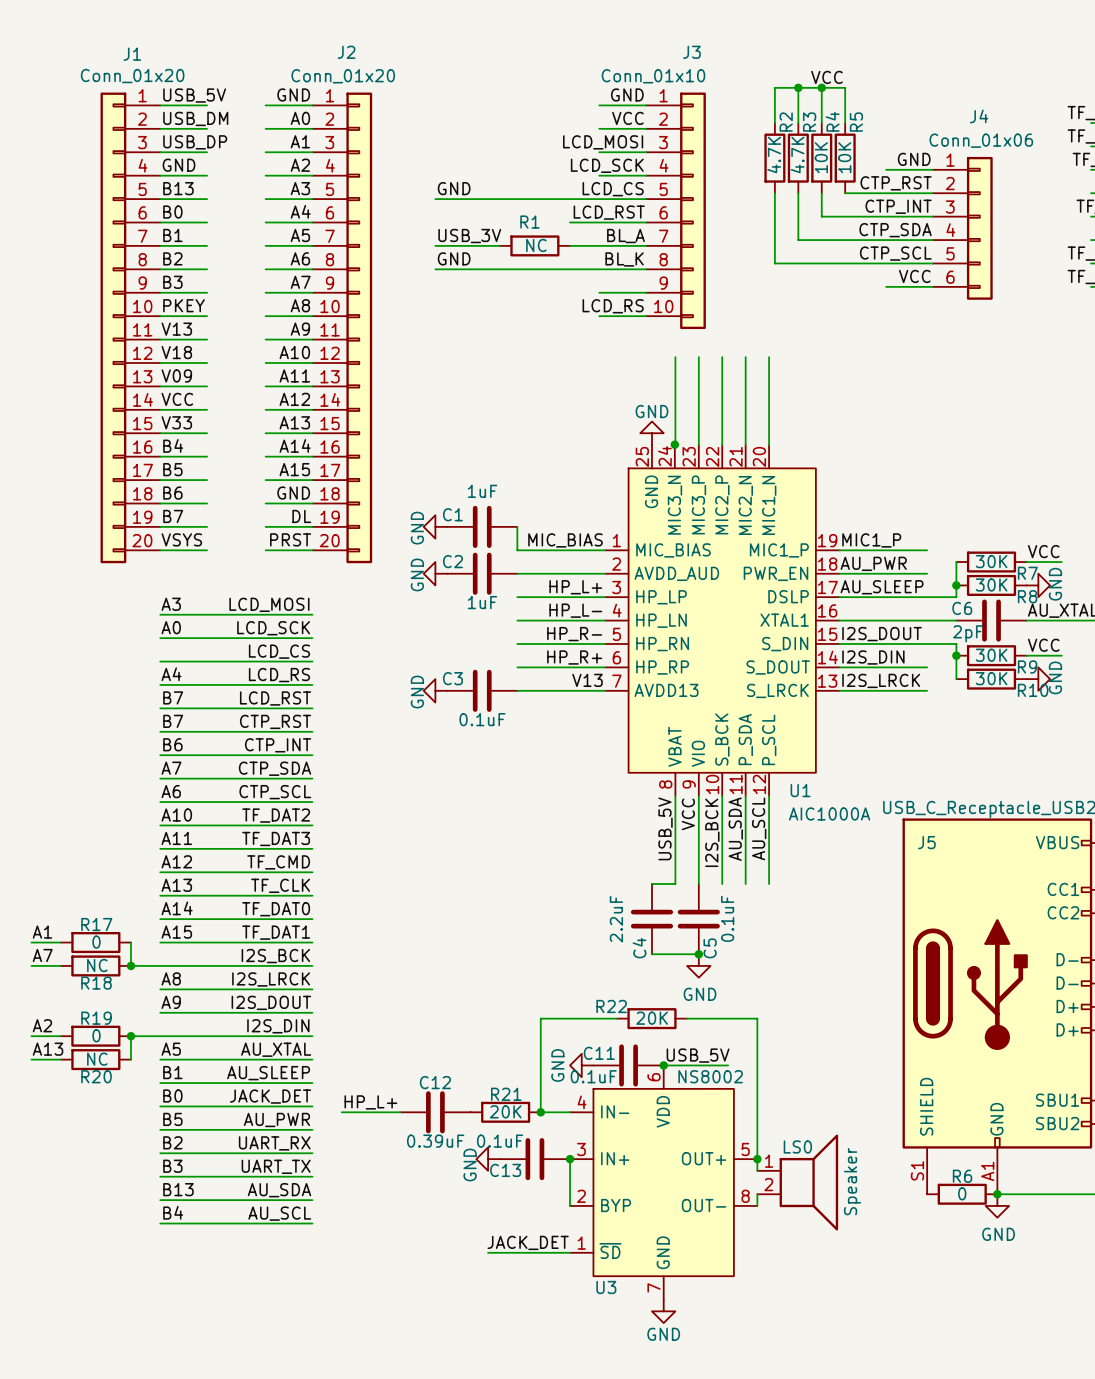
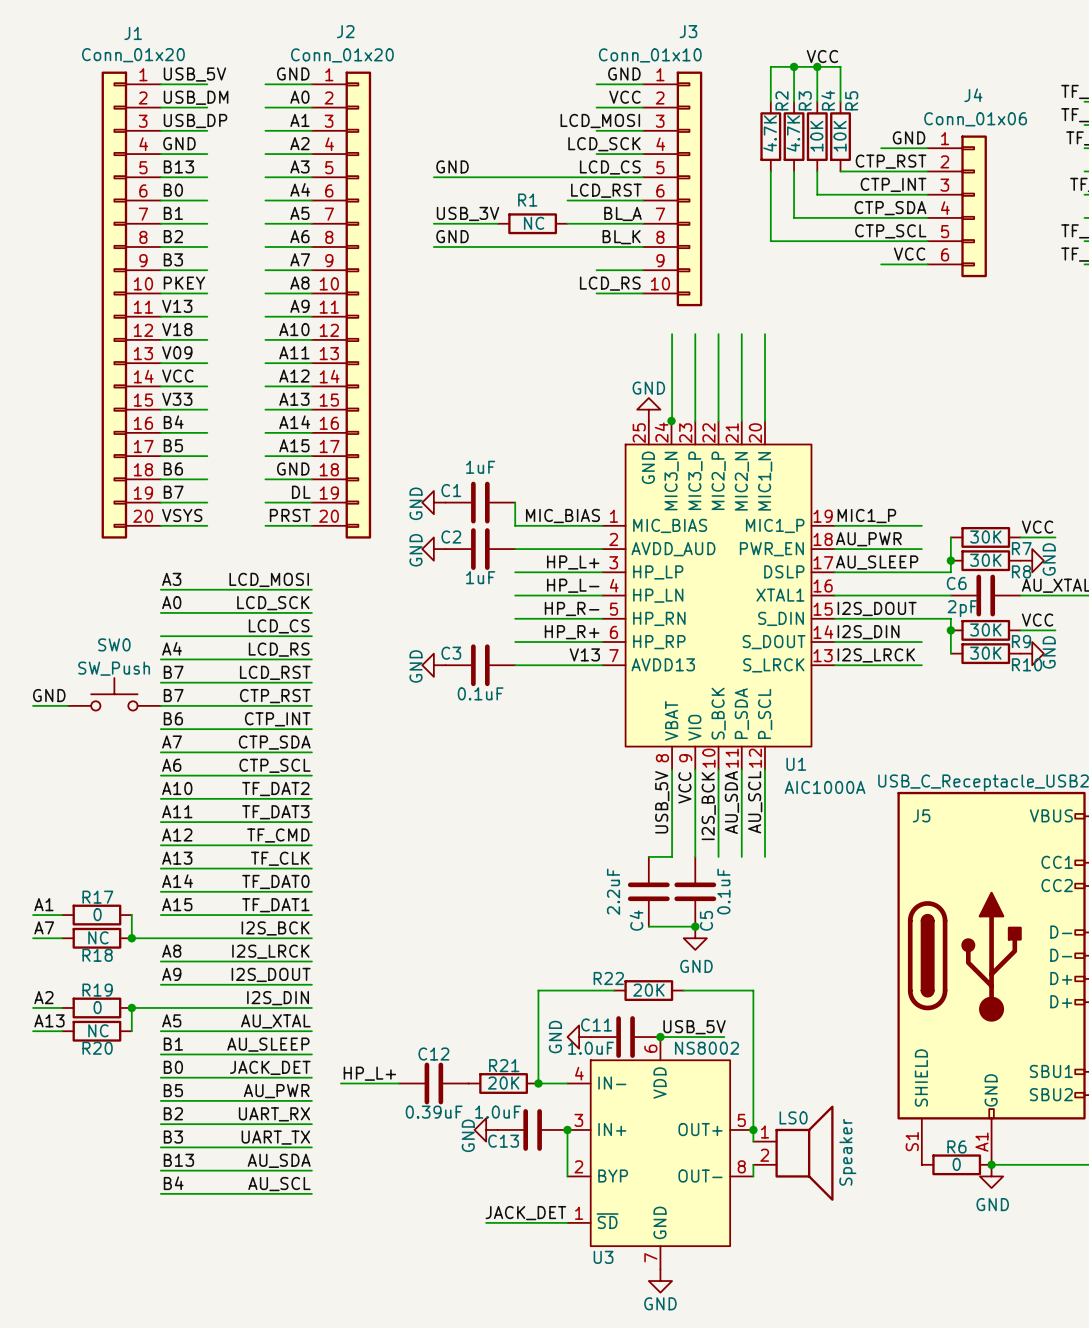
SW0: none -> SW_Push (114, 694)
label: none -> GND (49, 695)
wire: none -> (33, 705) (67, 705)
C11 value: 0.1uF (593, 1076) -> 1.0uF (591, 1048)
C13 value: 0.1uF (500, 1141) -> 1.0uF (498, 1112)

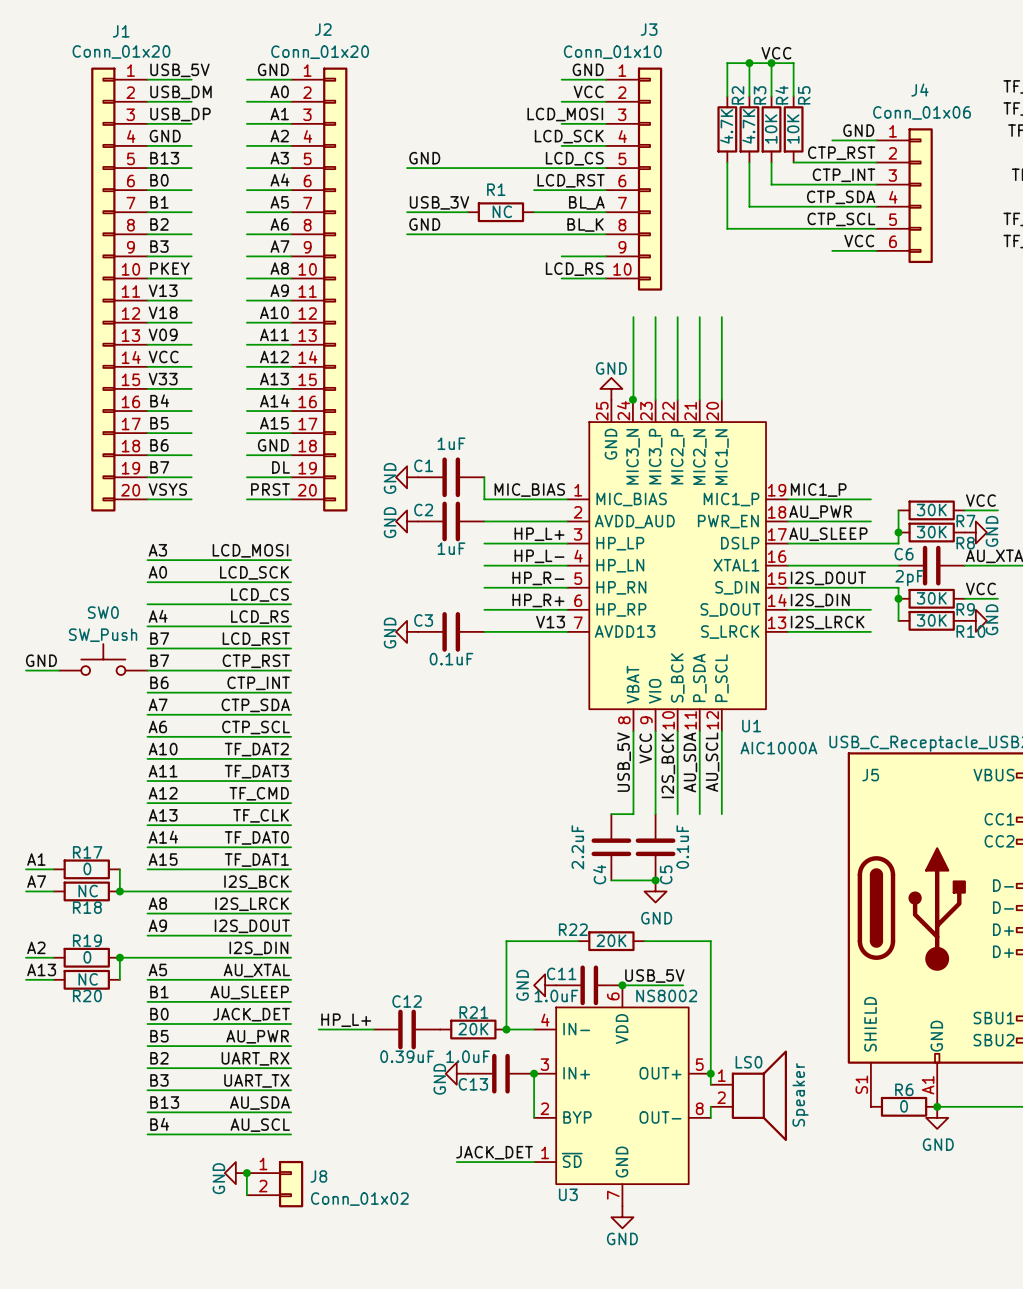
power symbol: none -> GND (235, 1173)
wire: none -> (246, 1173) (246, 1195)
junction: none -> (246, 1173)
J8: none -> Conn_01x02 (275, 1184)

